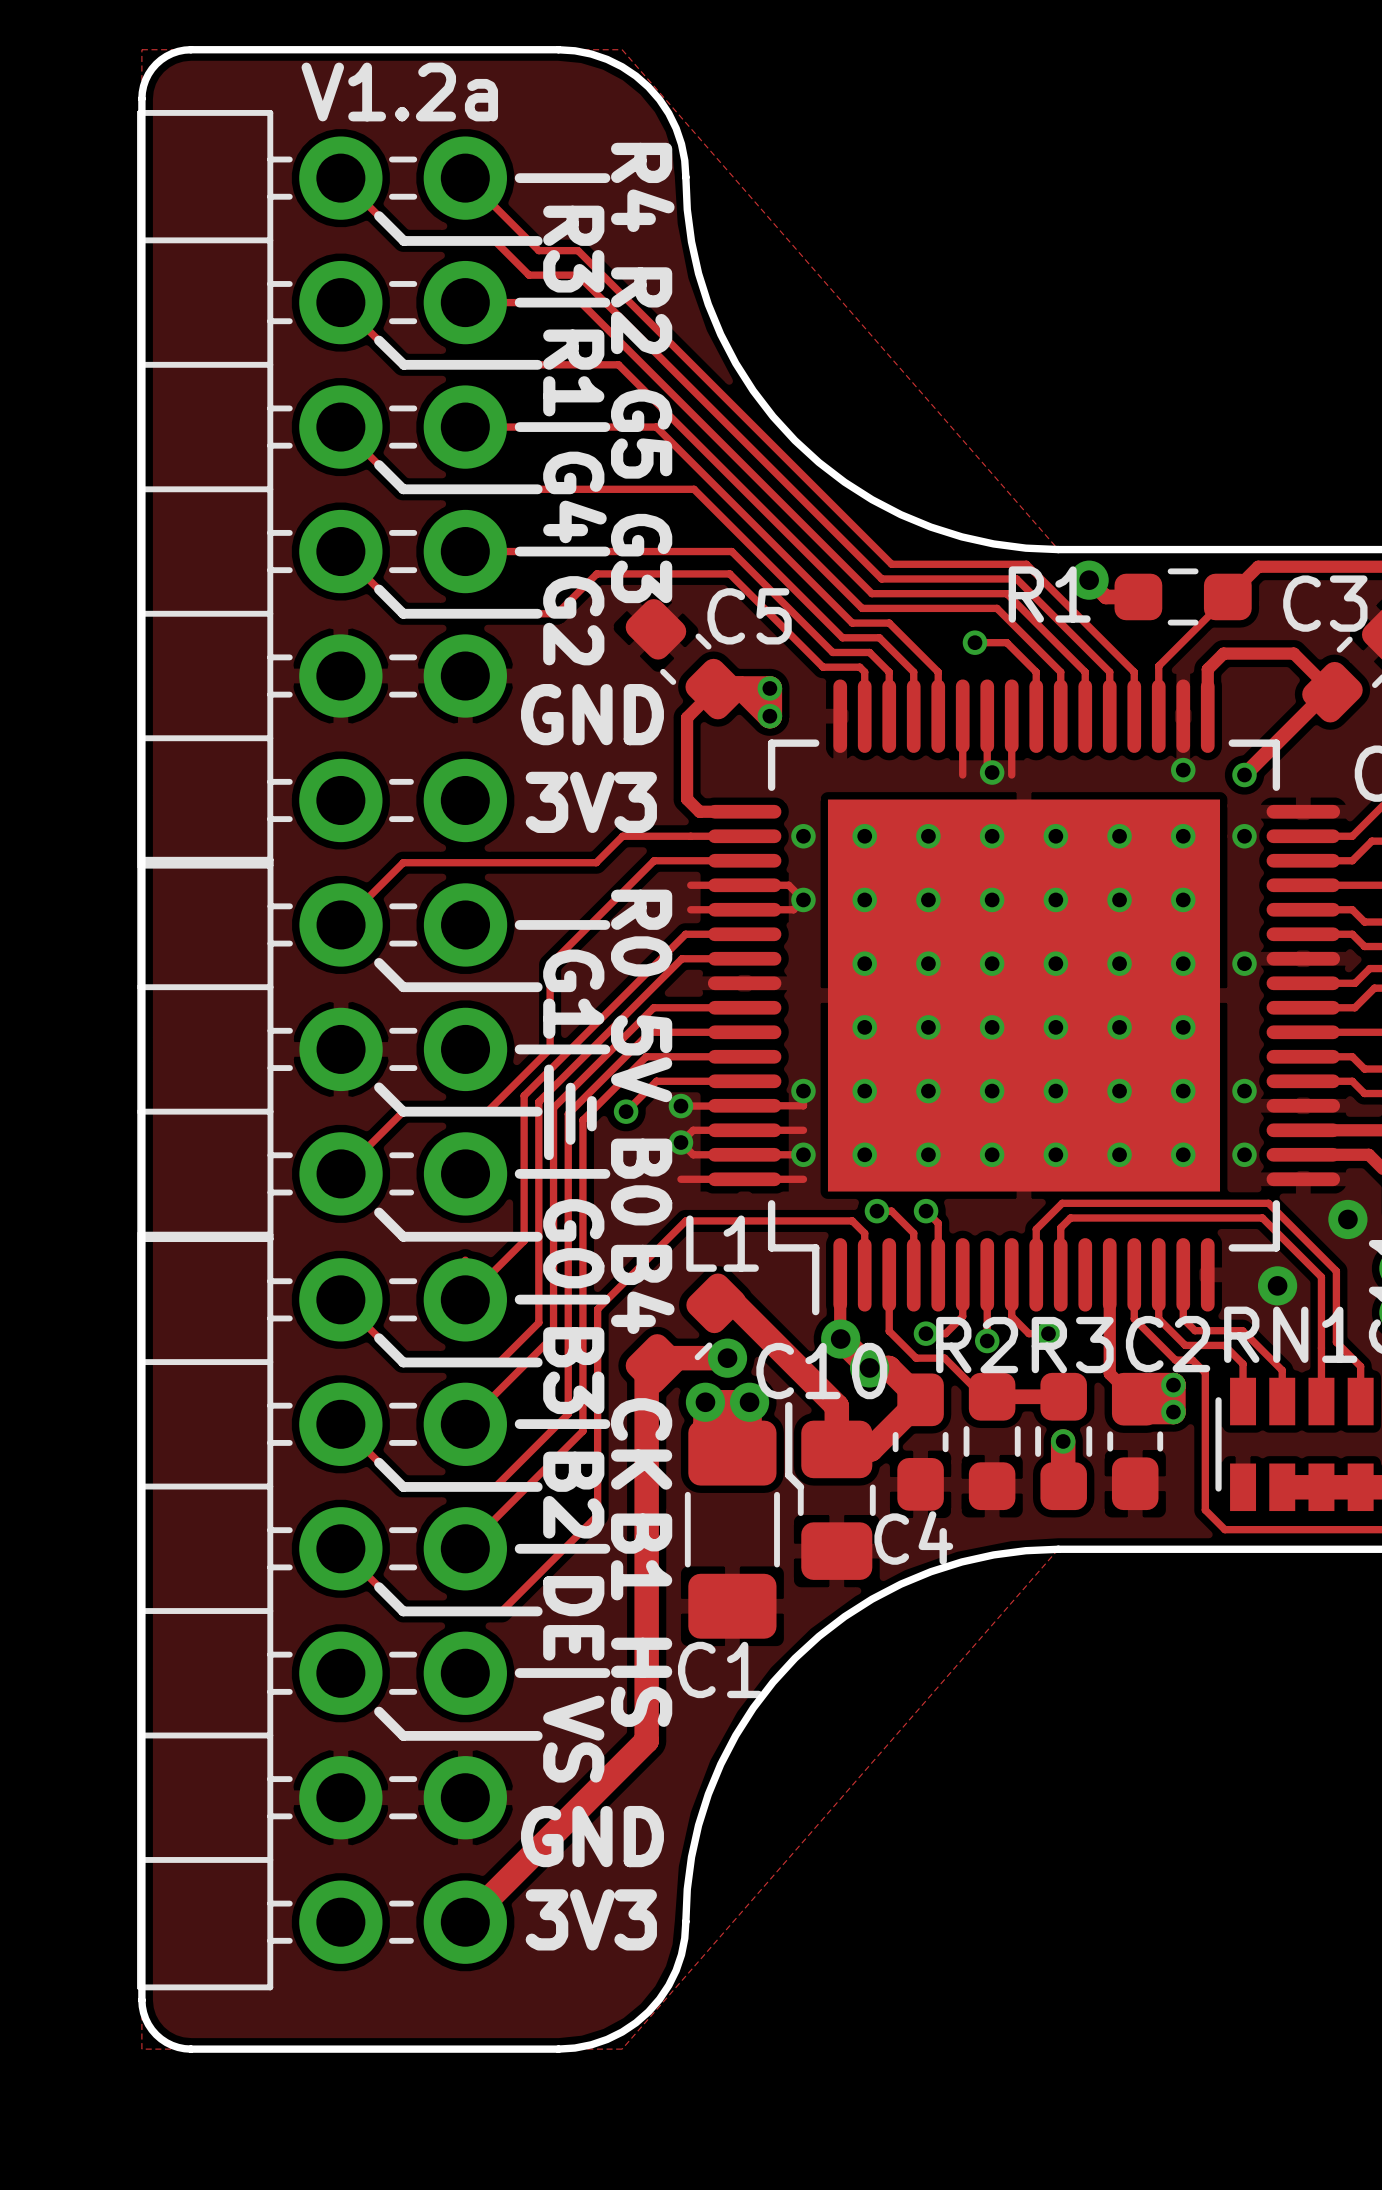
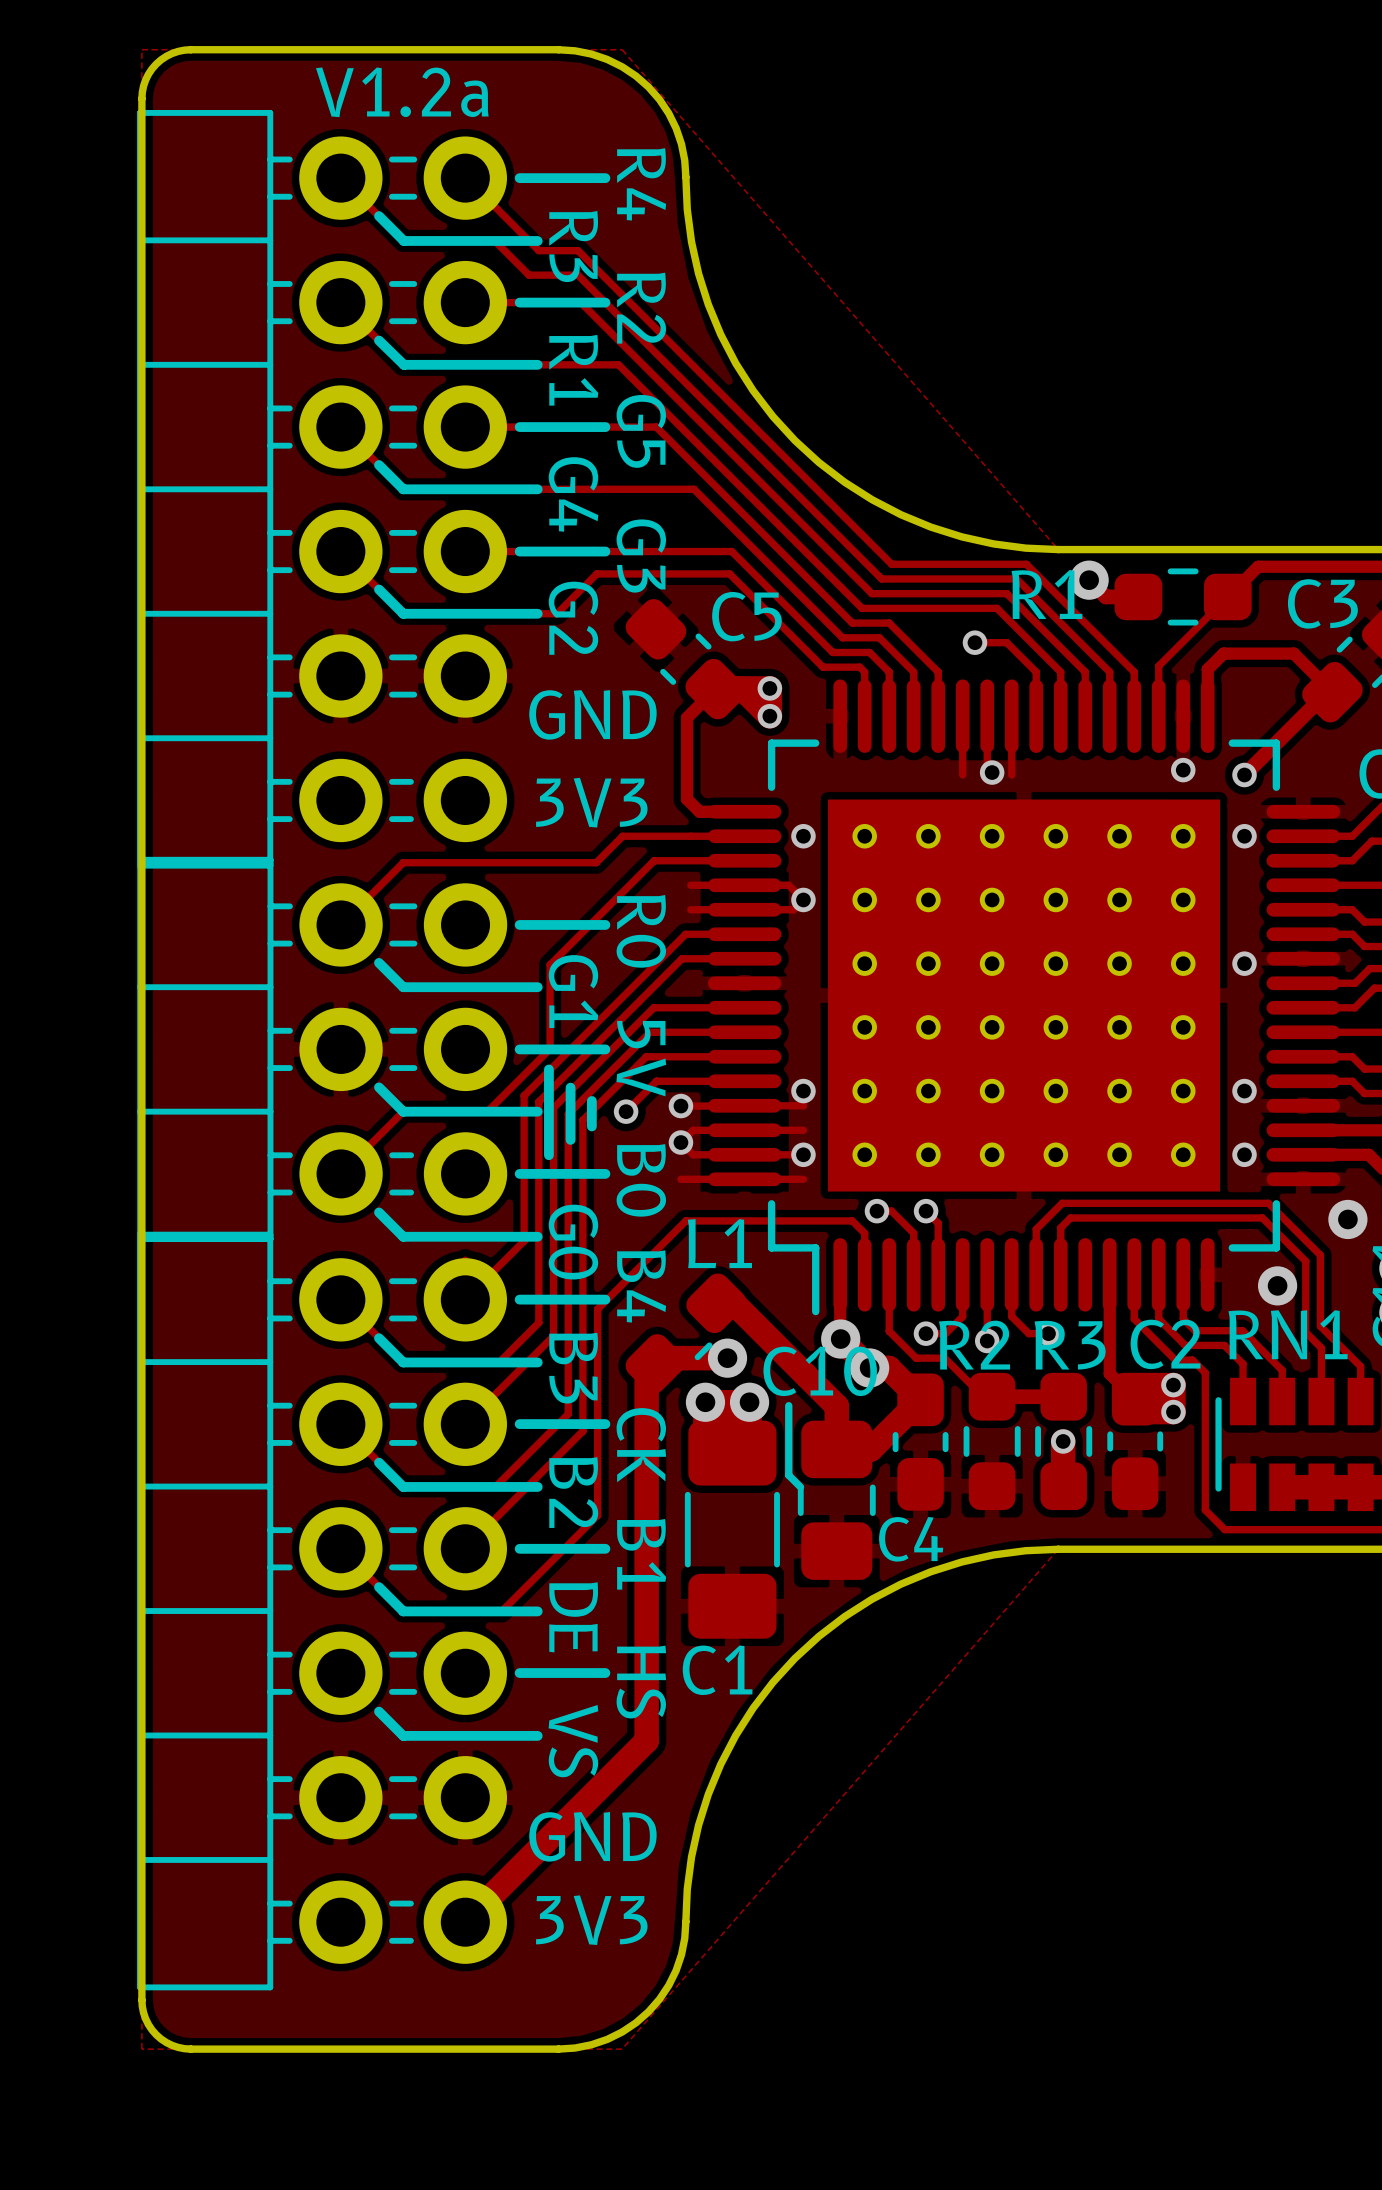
track: (1320, 1255) (1336, 1271) (1336, 1342) -> (1320, 1255) (1320, 1326) (1336, 1342)
track: (1305, 1261) (1321, 1277) (1321, 1348) -> (1305, 1261) (1305, 1332) (1321, 1348)

